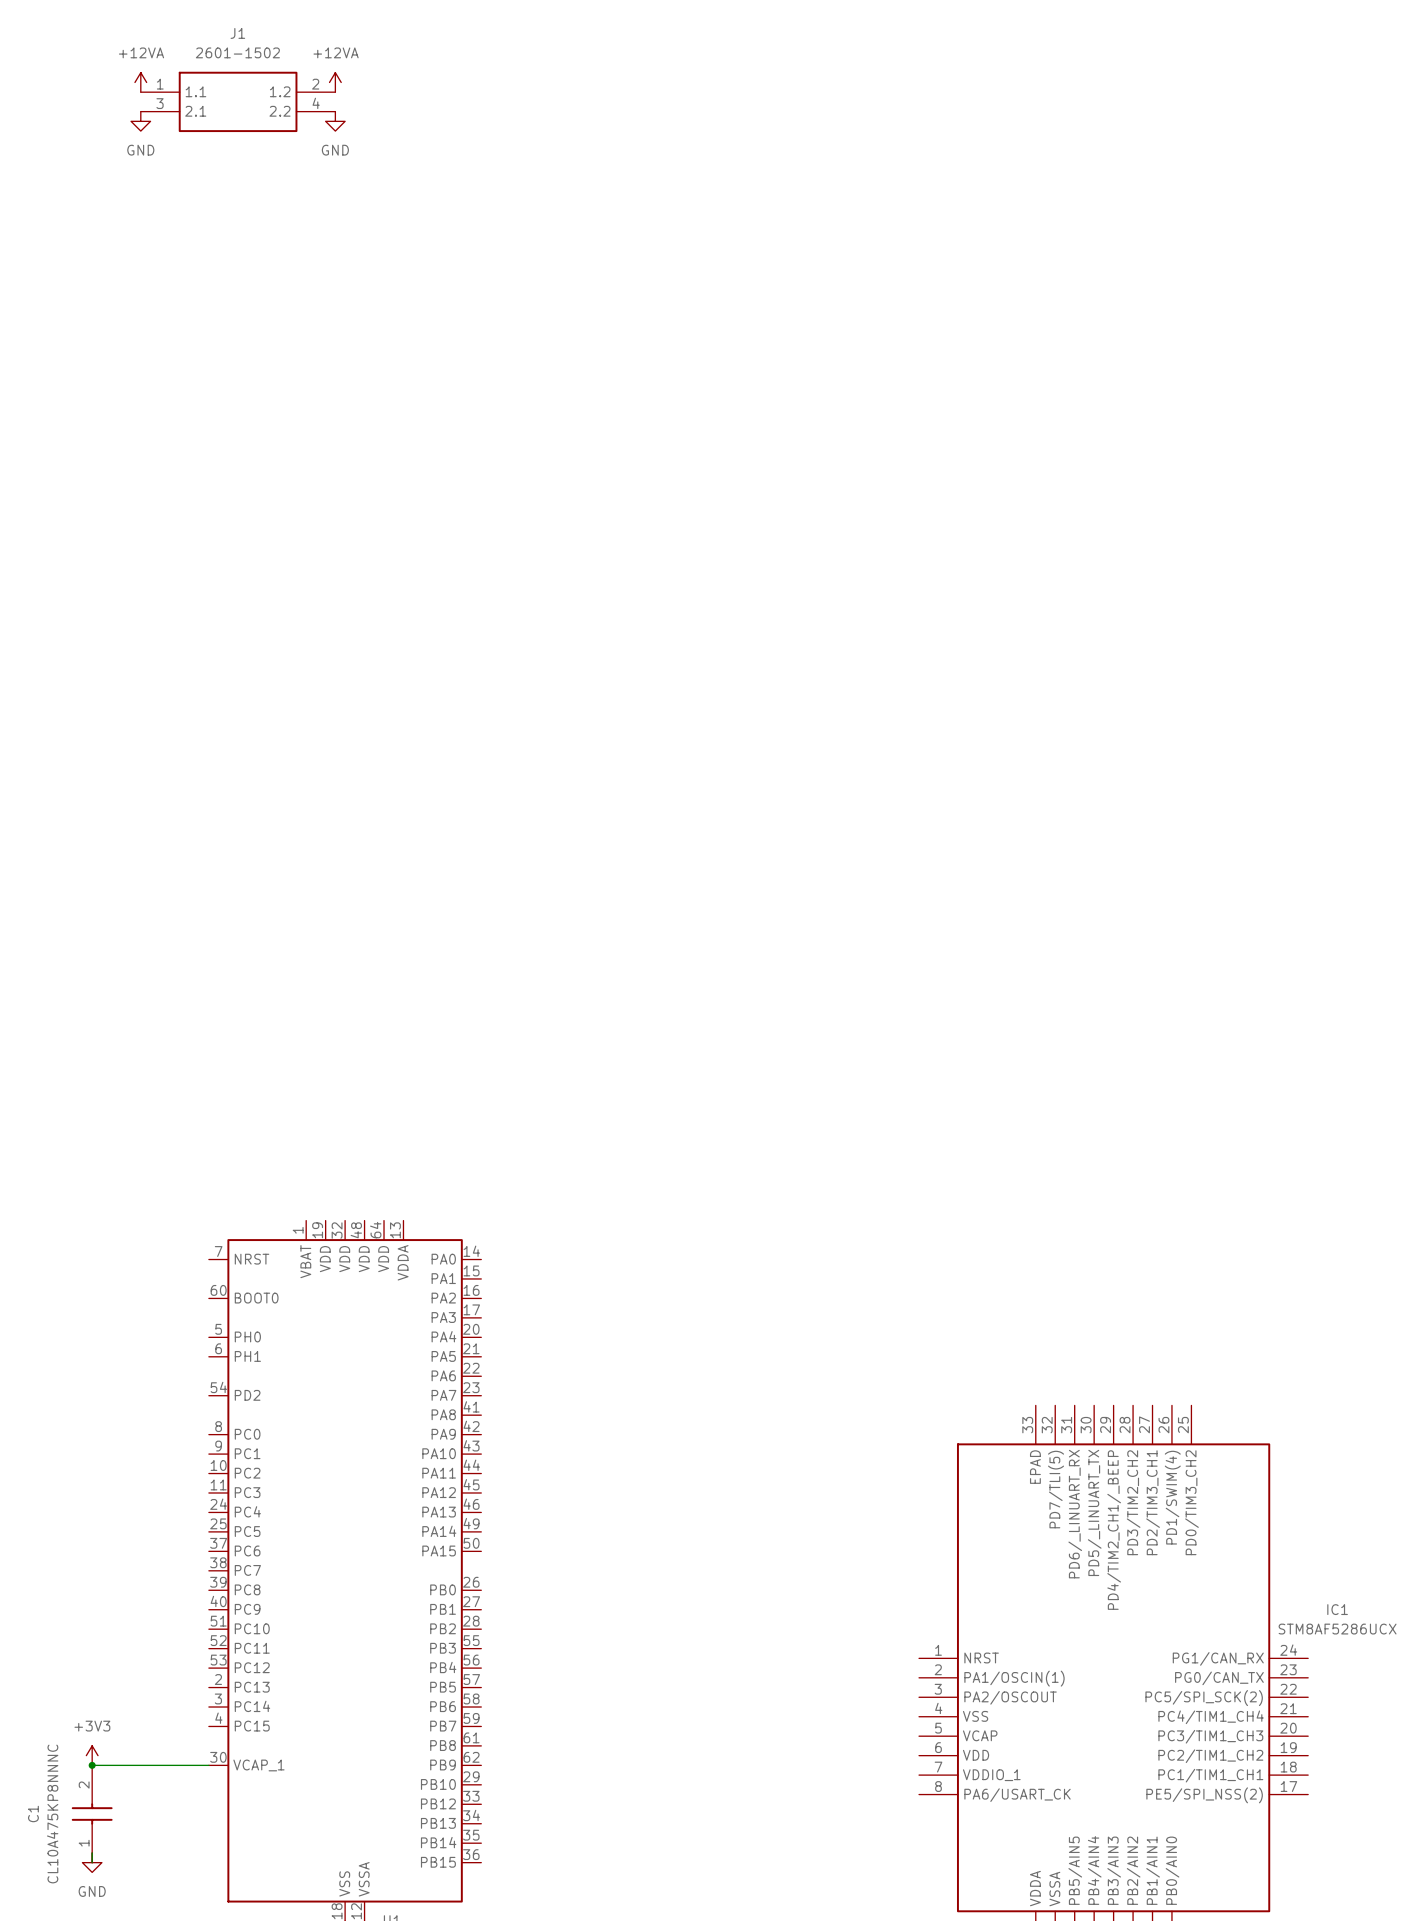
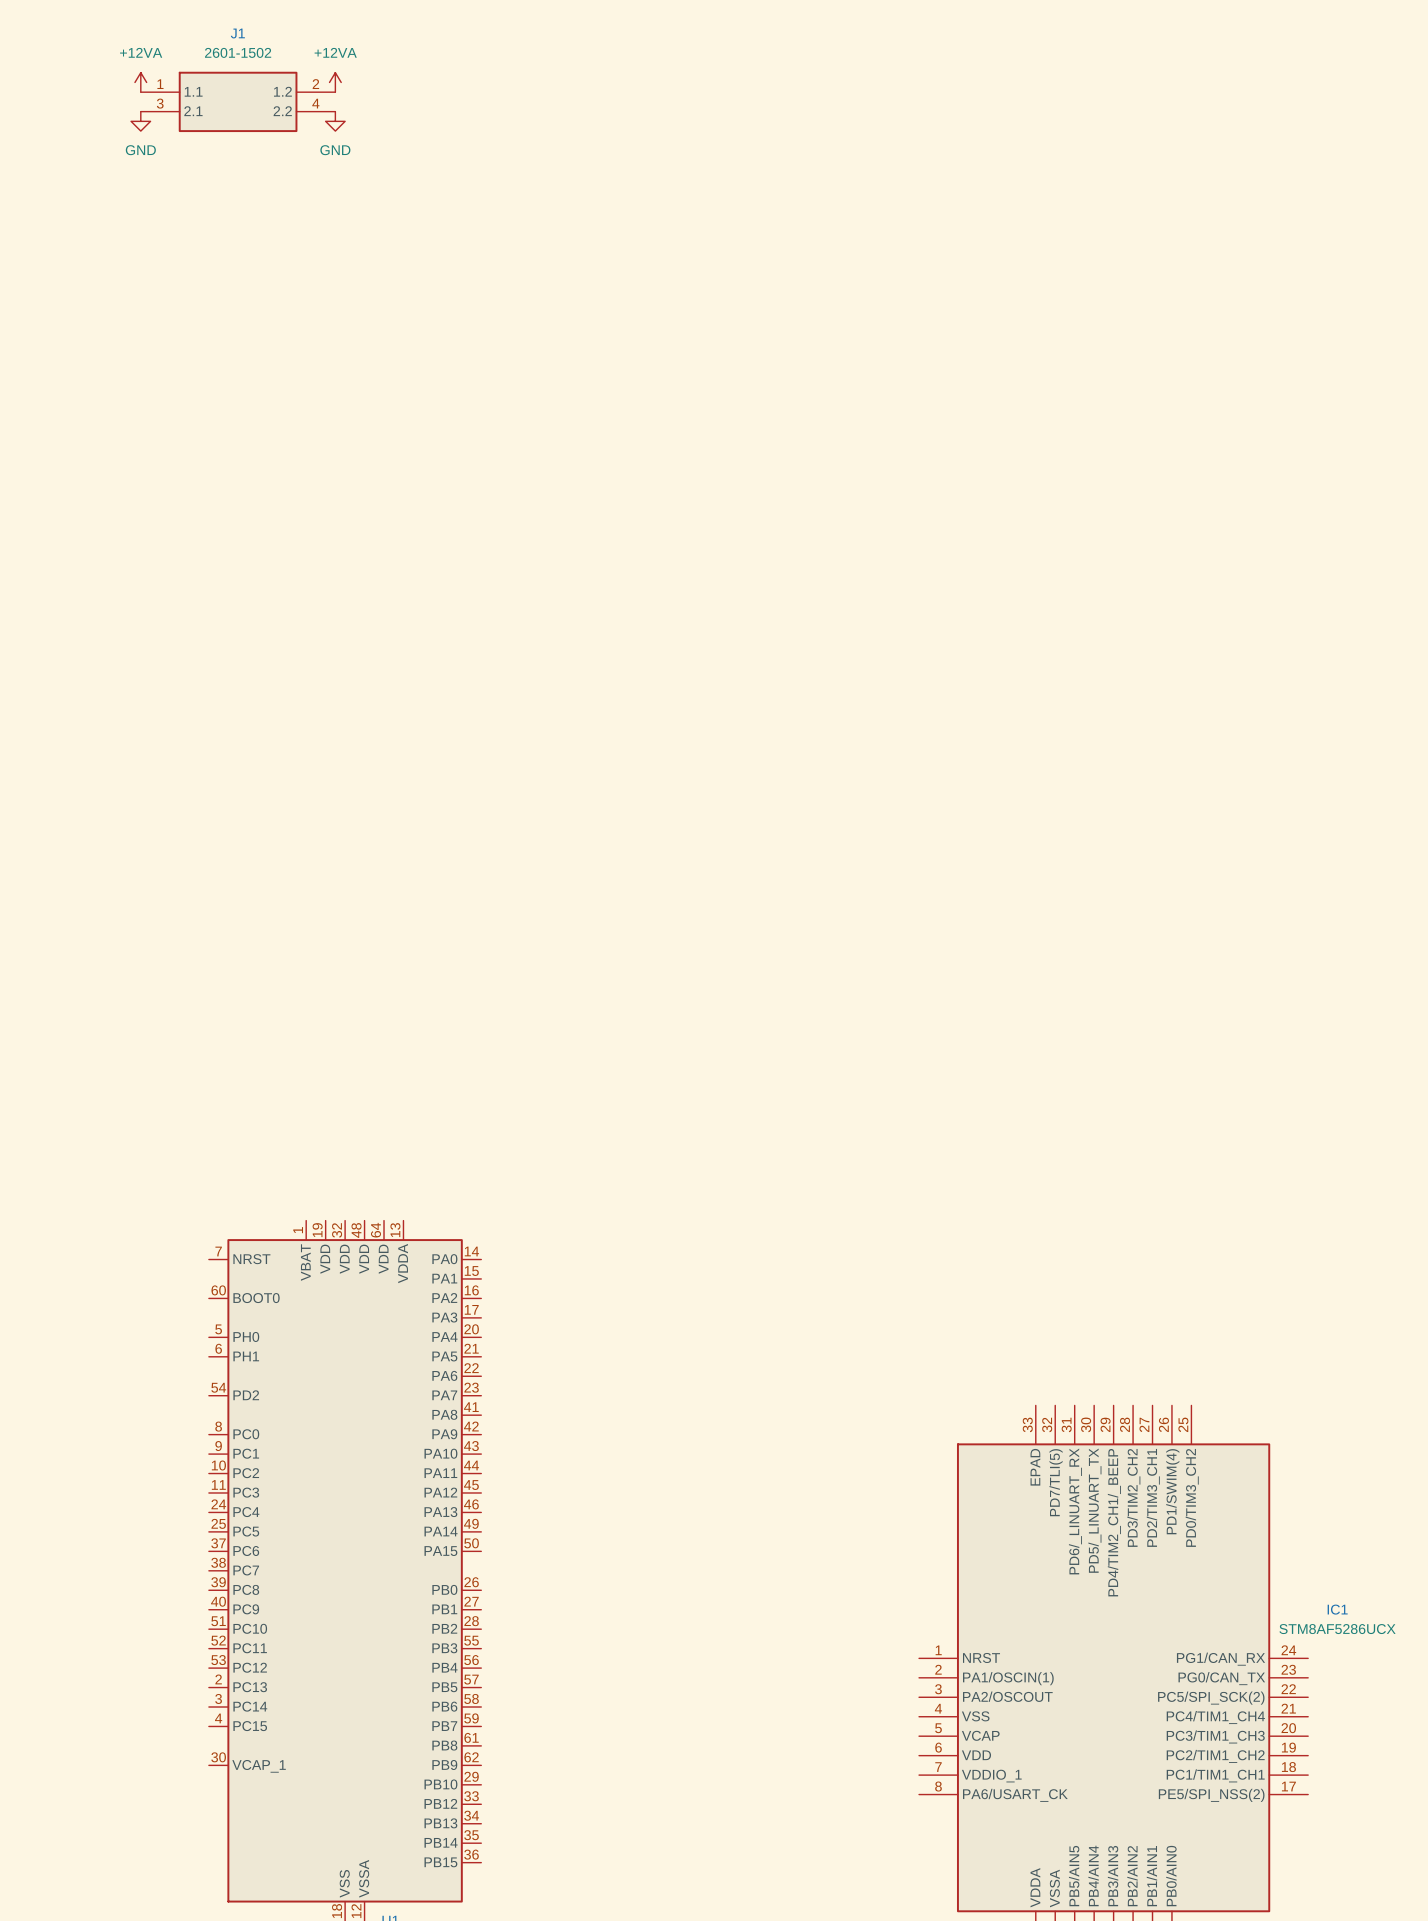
power symbol: +3V3 (92, 1755) -> none
wire: (92, 1765) (208, 1765) -> none
junction: (92, 1765) -> none
C1: CL10A475KP8NNNC (92, 1814) -> none
wire: (92, 1852) (92, 1862) -> none
power symbol: GND (92, 1862) -> none

